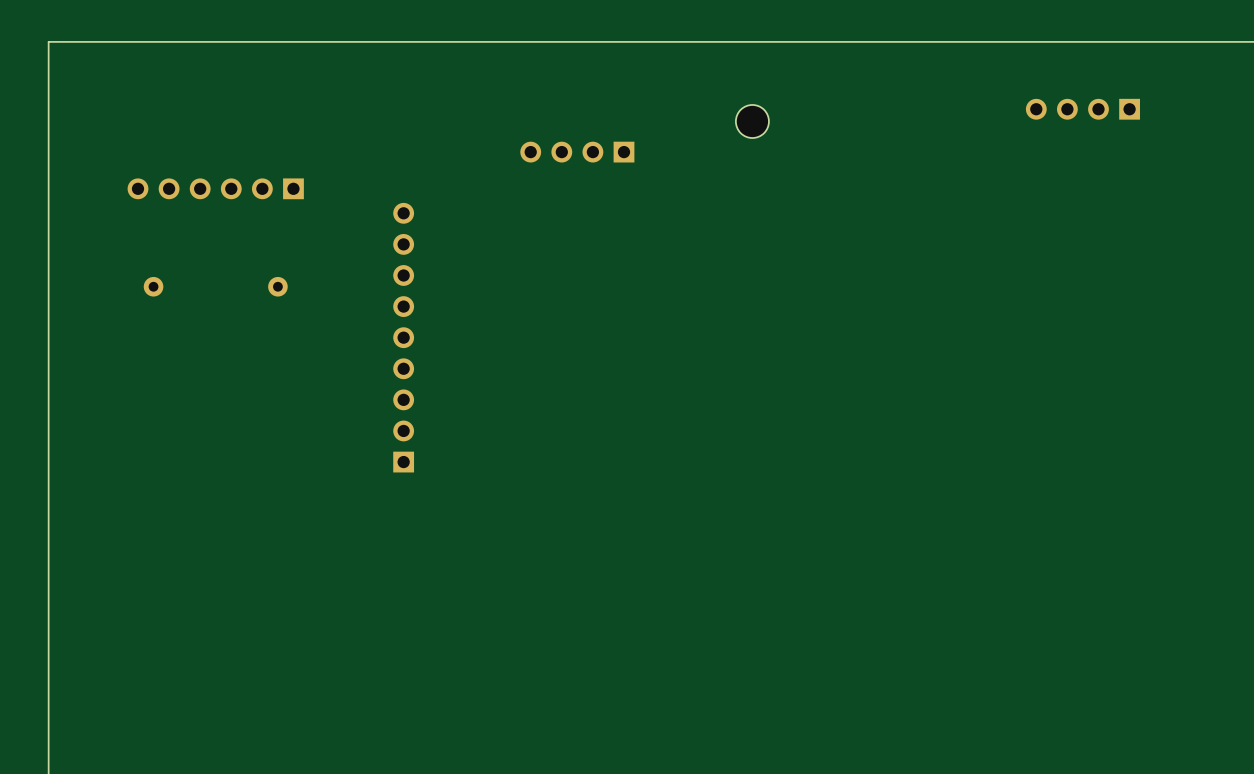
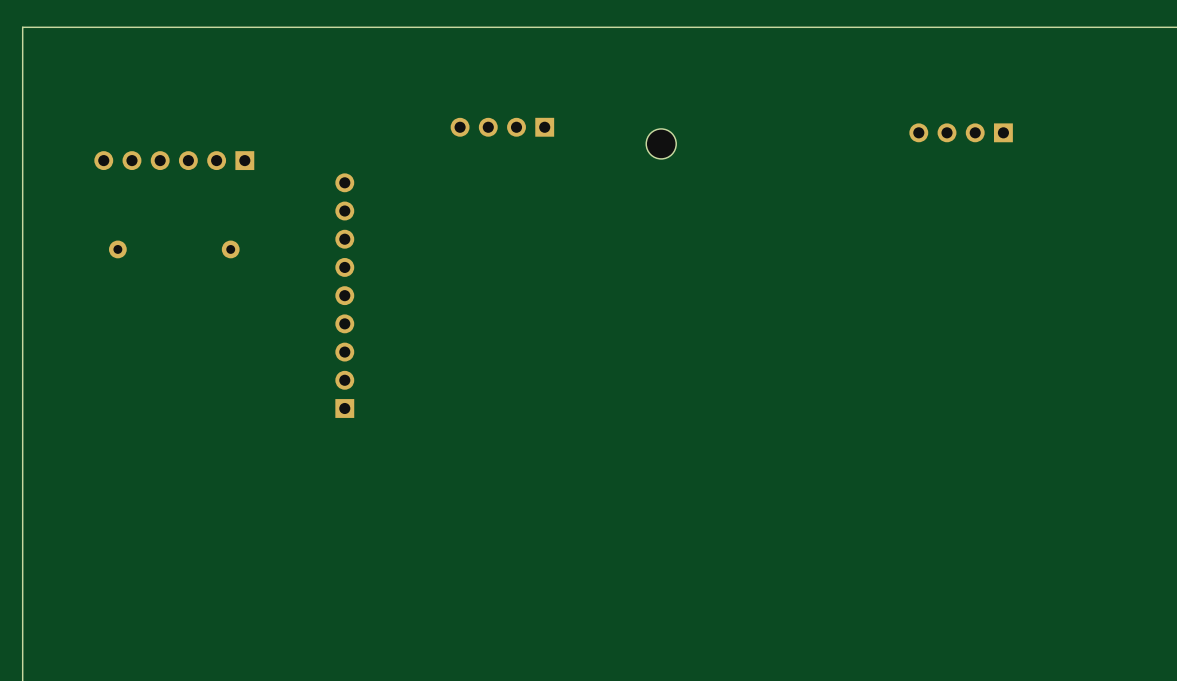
part position: (1082, 109) -> (961, 132)
part position: (752, 121) -> (661, 143)

